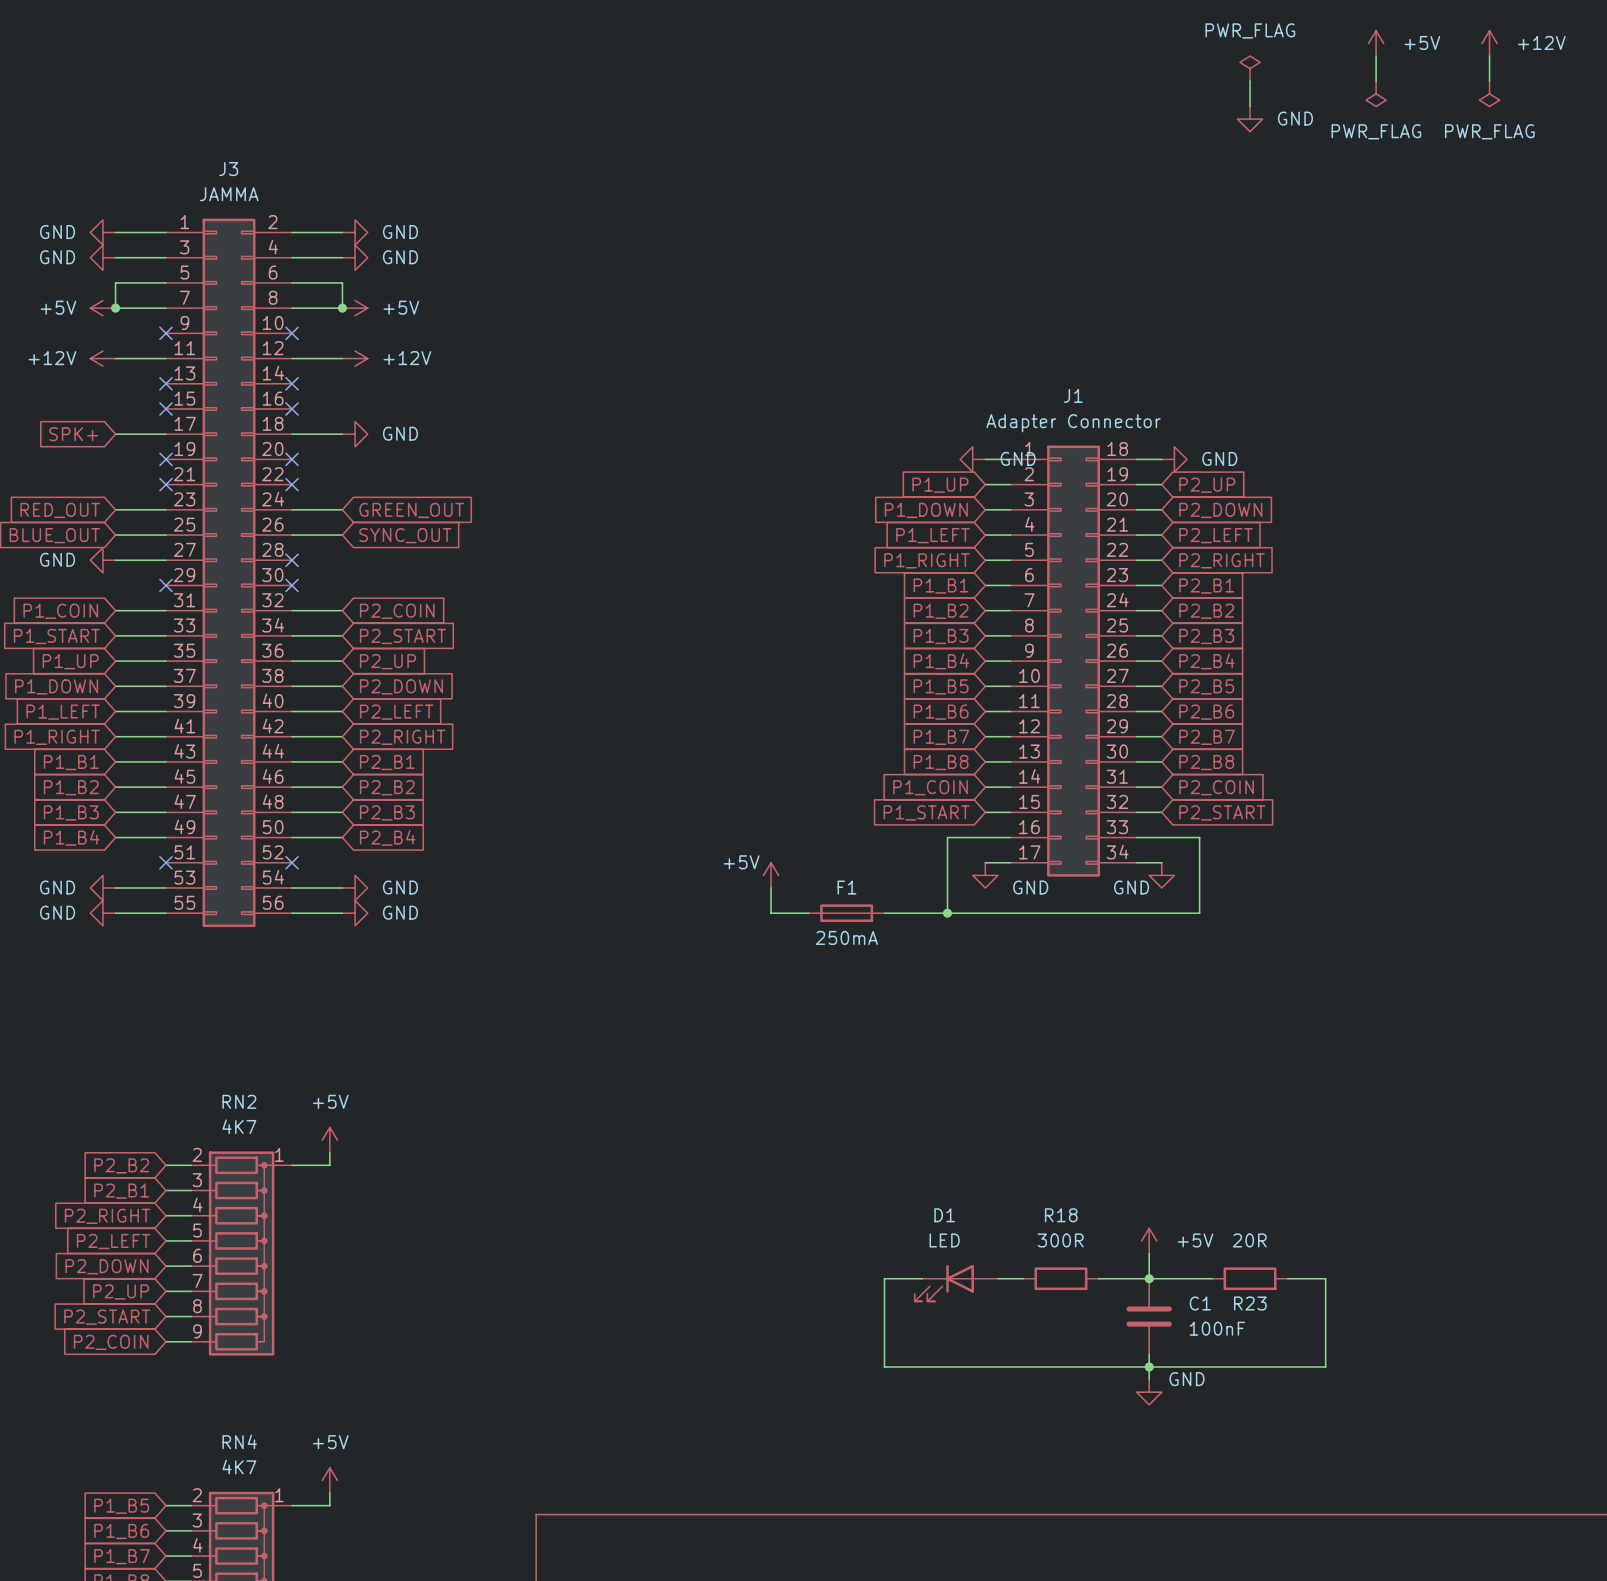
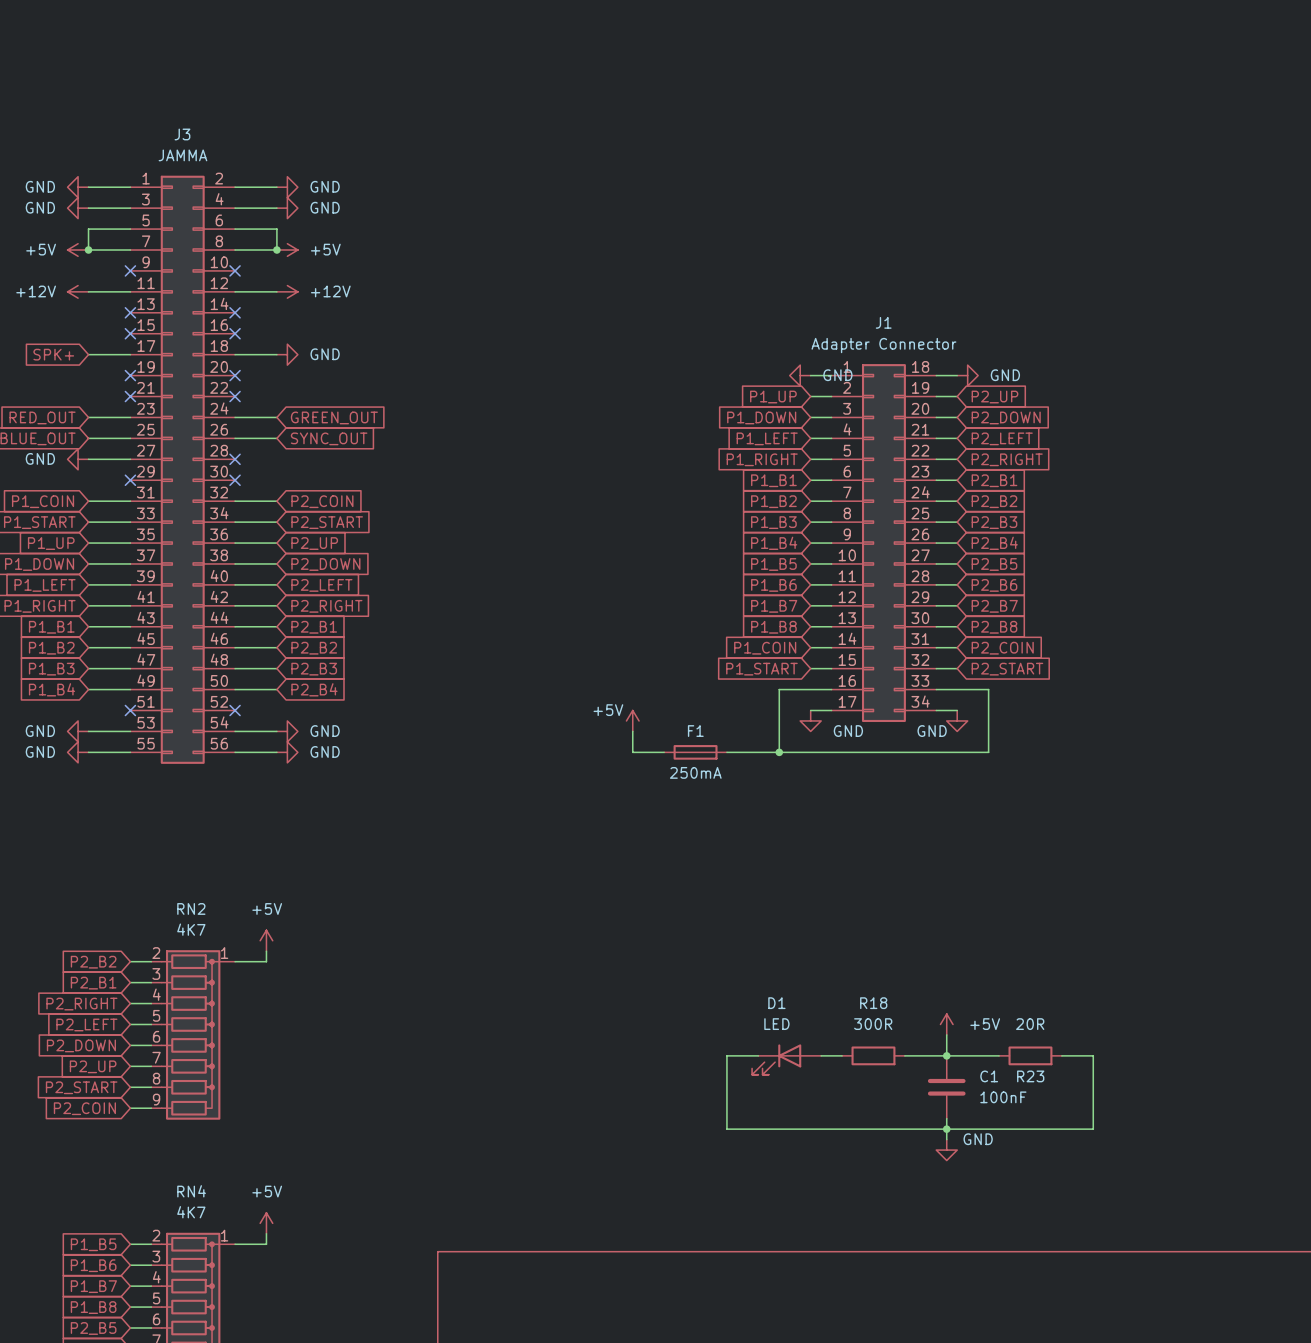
power symbol: +5V (1376, 43) -> none
power symbol: +12V (1489, 43) -> none
wire: (1376, 56) (1376, 81) -> none
wire: (1489, 56) (1489, 81) -> none
power symbol: PWR_FLAG (1250, 68) -> none
wire: (1250, 81) (1250, 106) -> none
power symbol: PWR_FLAG (1376, 93) -> none
power symbol: PWR_FLAG (1489, 93) -> none
power symbol: GND (1250, 119) -> none

